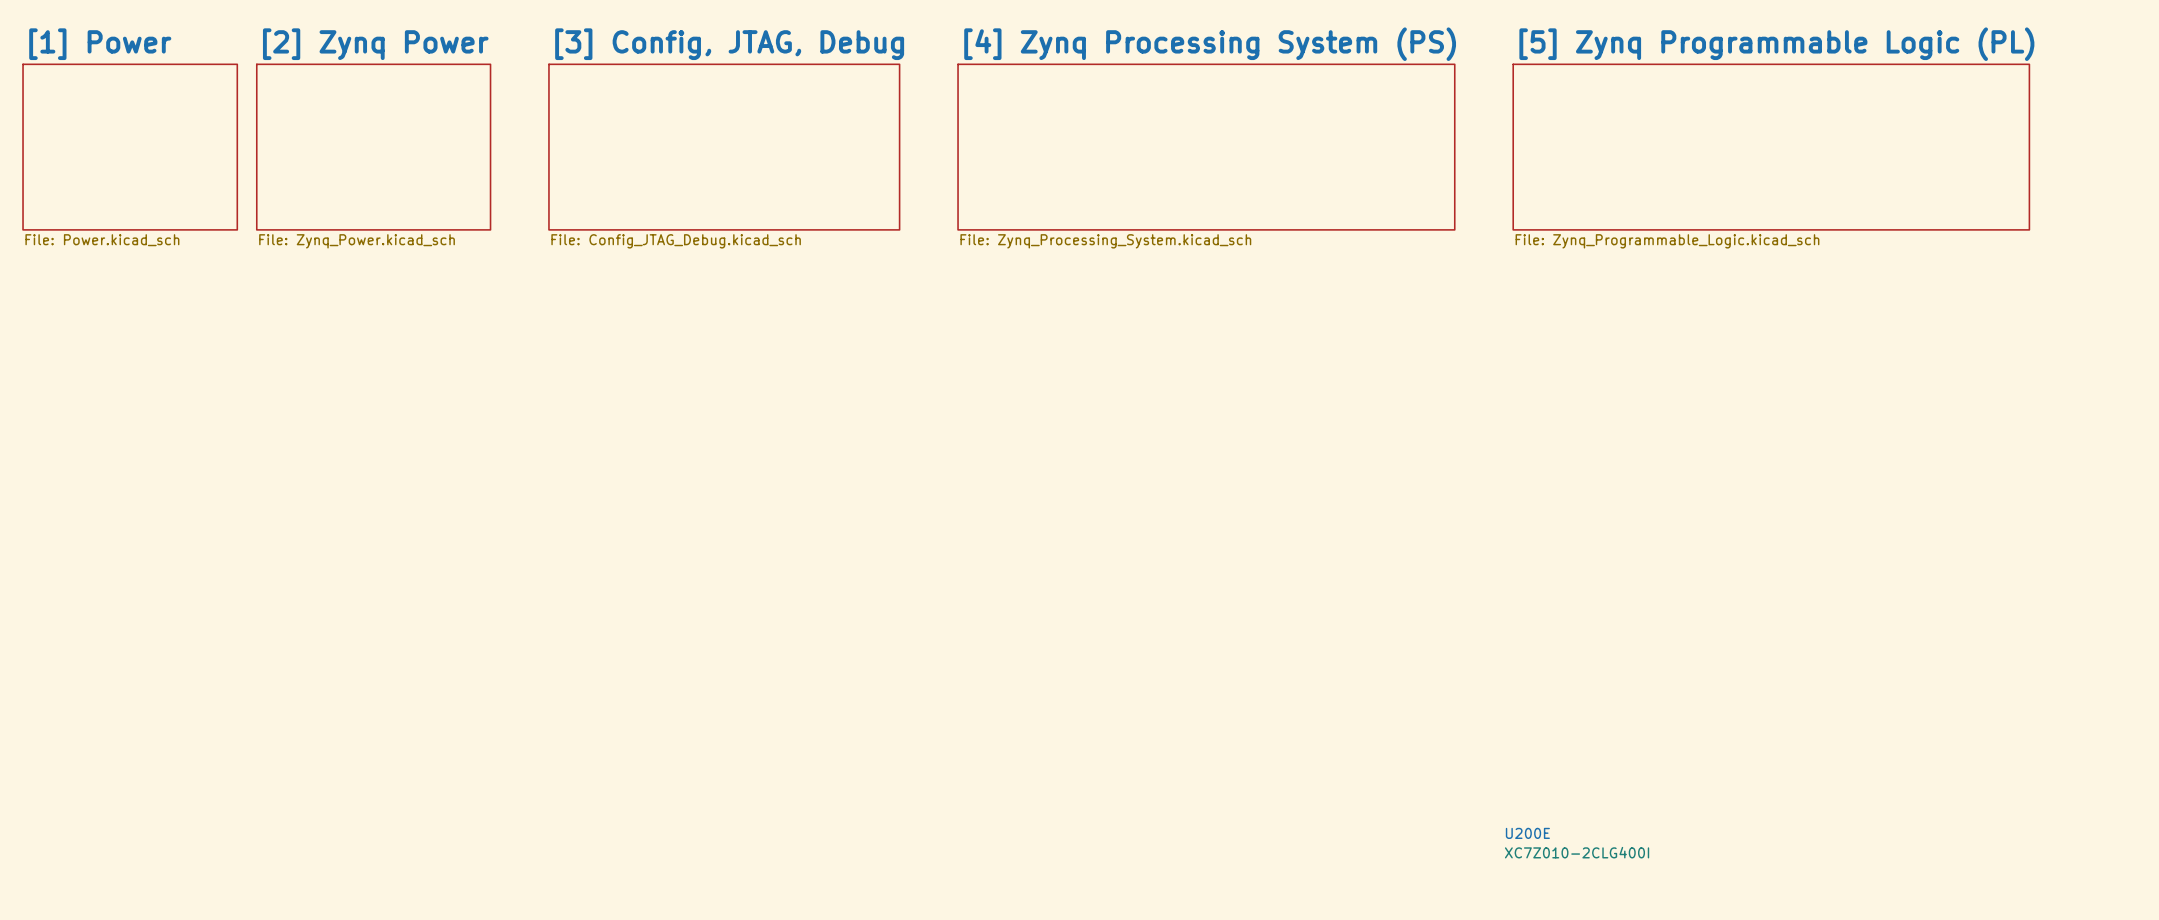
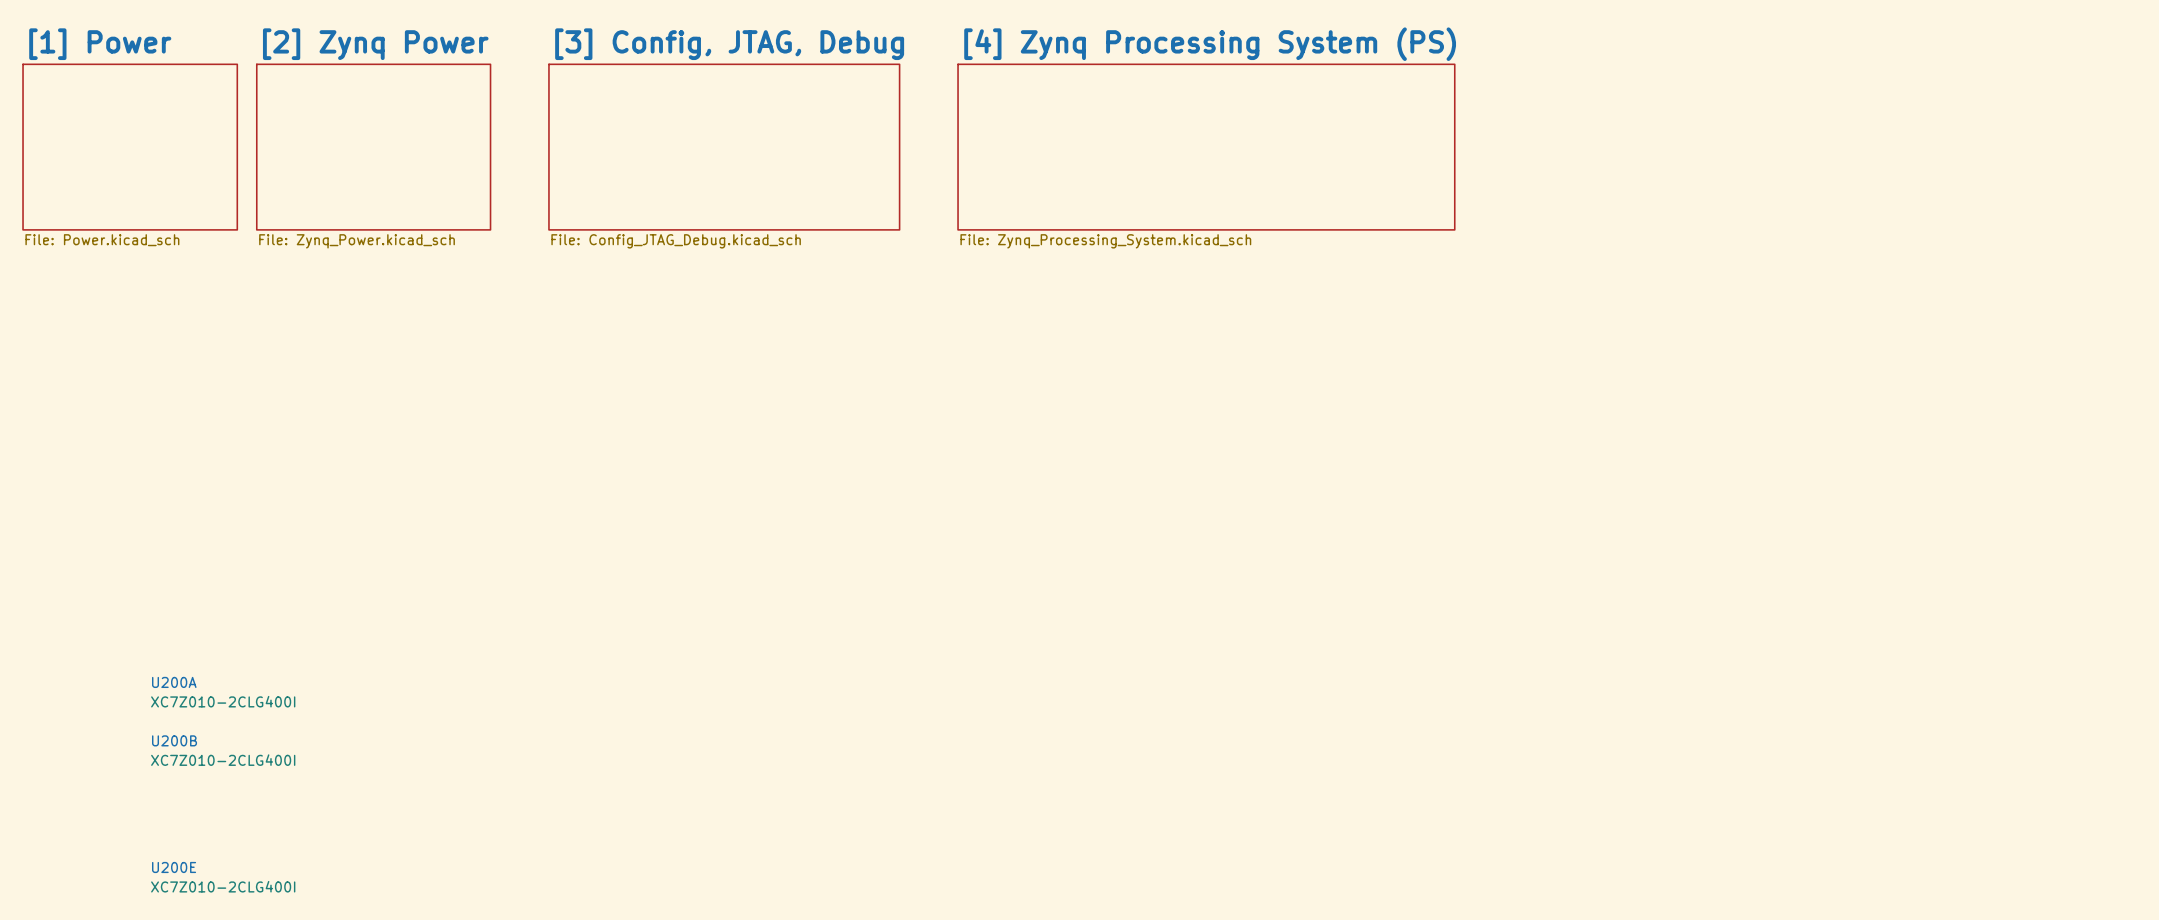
sheet [5] Zynq Programmable Logic (PL): File: Zynq_Programmable_Logic.kicad_sch (1771, 147) -> none
U200A: none -> XC7Z010-2CLG400I (223, 692)
U200B: none -> XC7Z010-2CLG400I (223, 750)
U200E position: (1577, 843) -> (223, 877)

